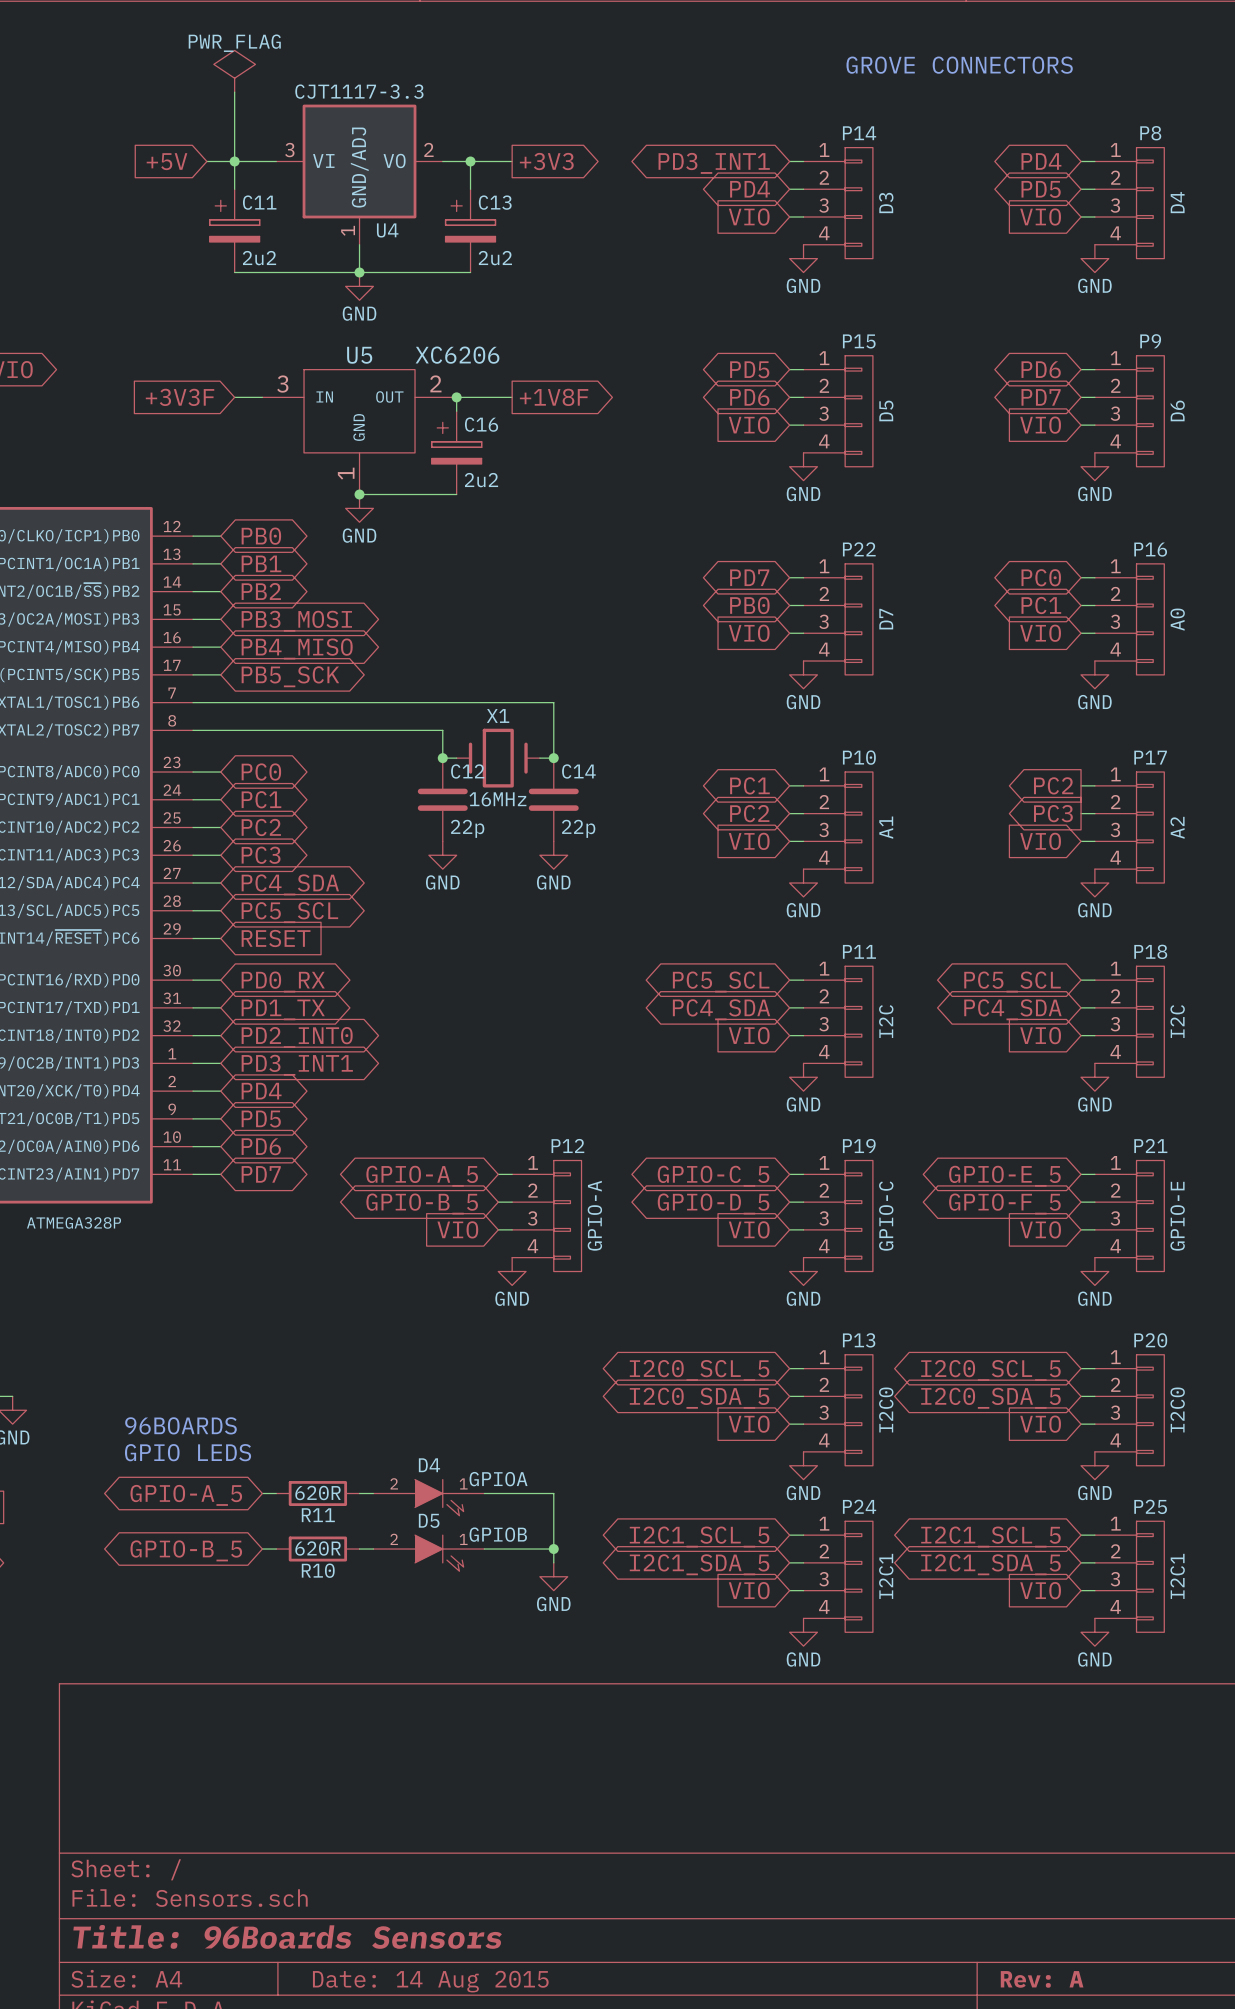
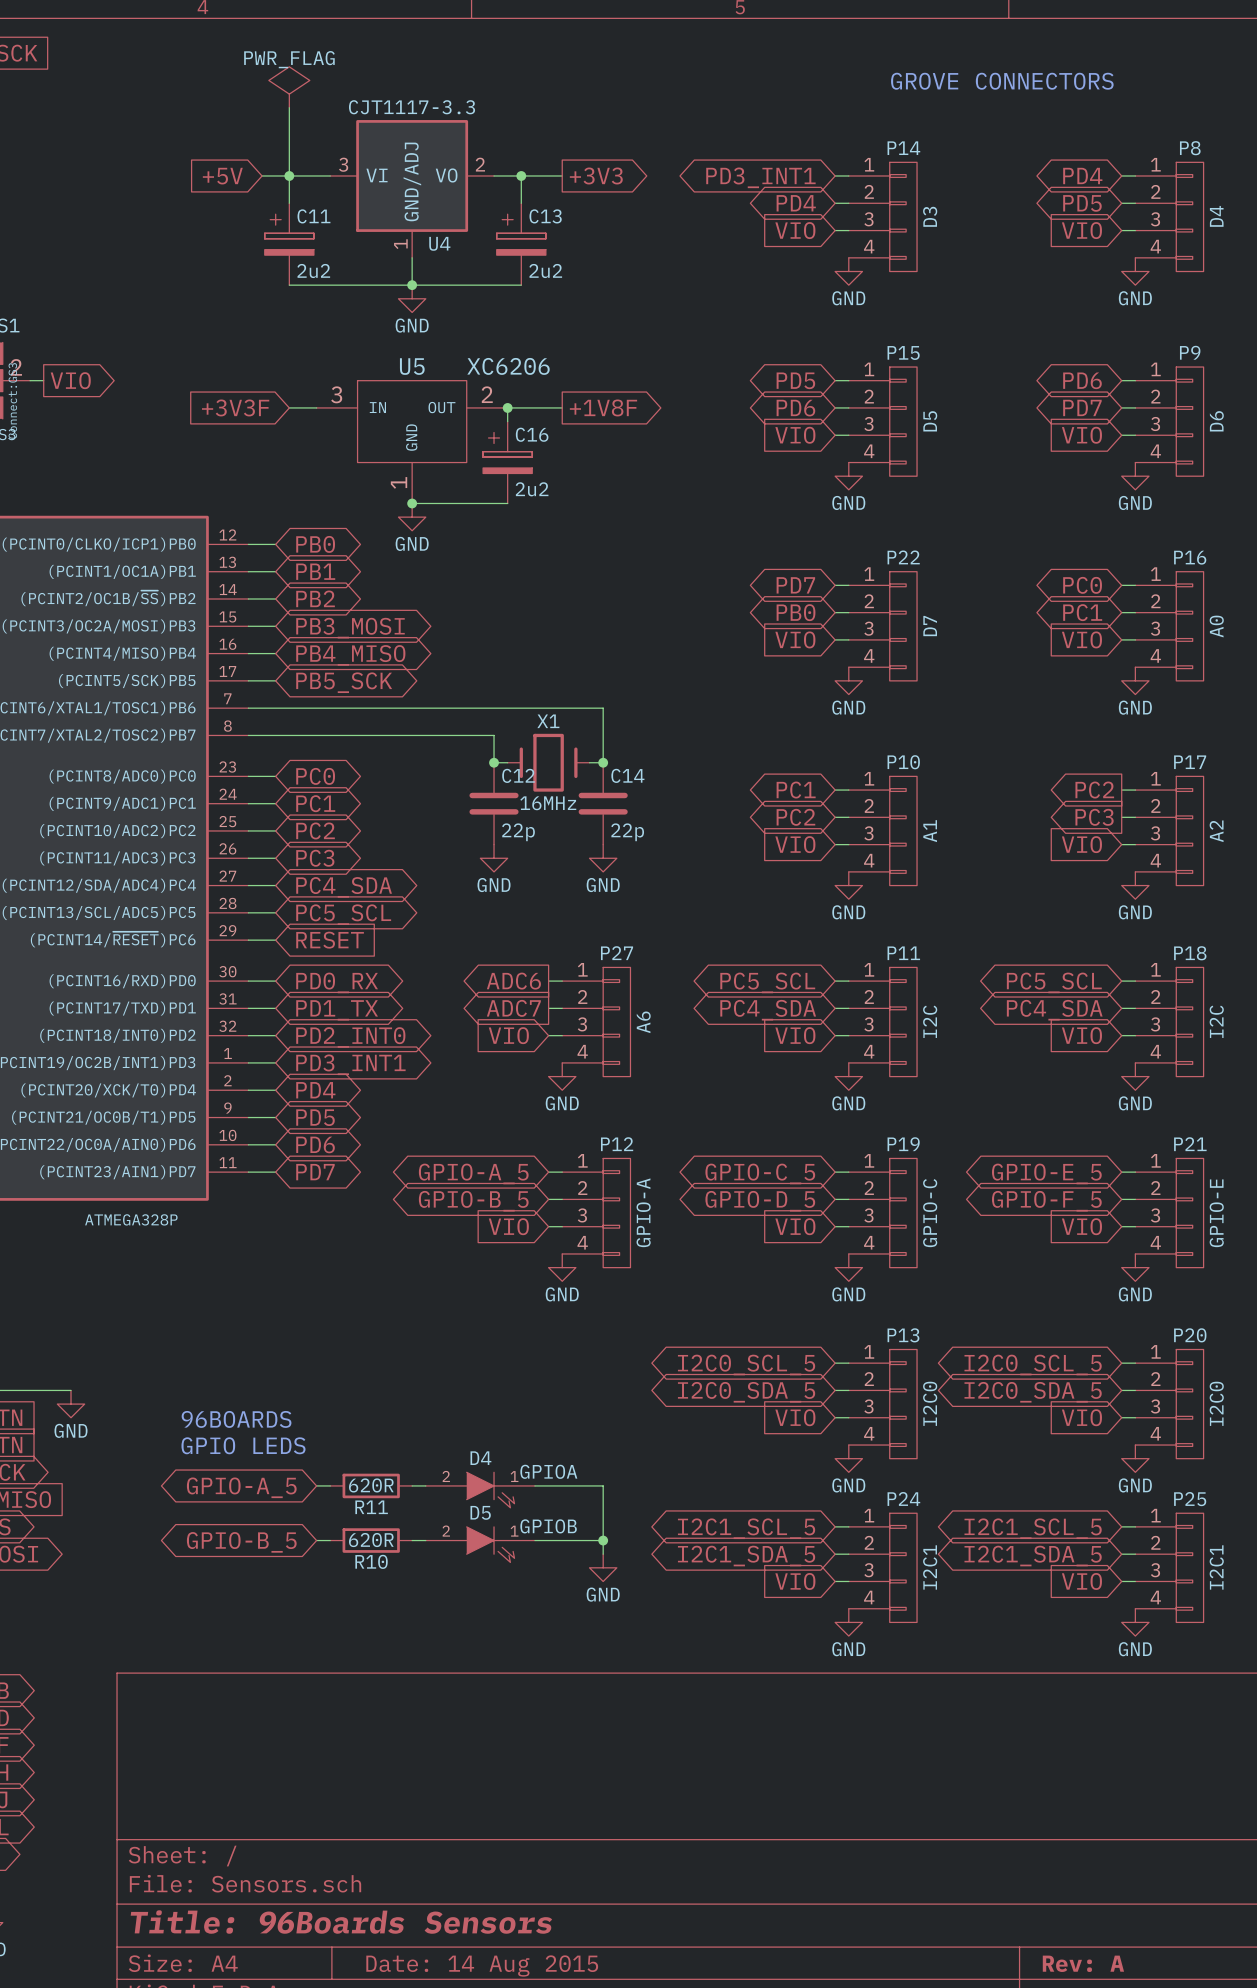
global label: none -> ADC6 (513, 981)
wire: none -> (548, 981) (562, 981)
global label: none -> ADC7 (513, 1008)
wire: none -> (548, 1008) (562, 1008)
P27: none -> A6 (596, 1022)
global label: none -> VIO (508, 1035)
wire: none -> (548, 1035) (562, 1035)
power symbol: none -> GND (562, 1076)

